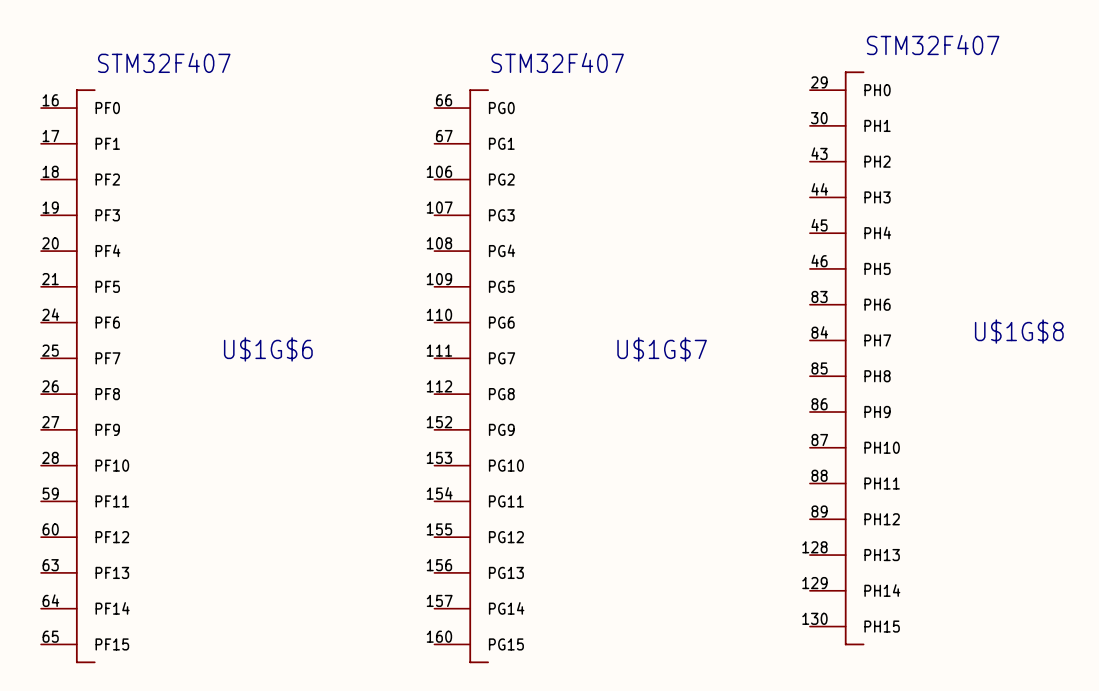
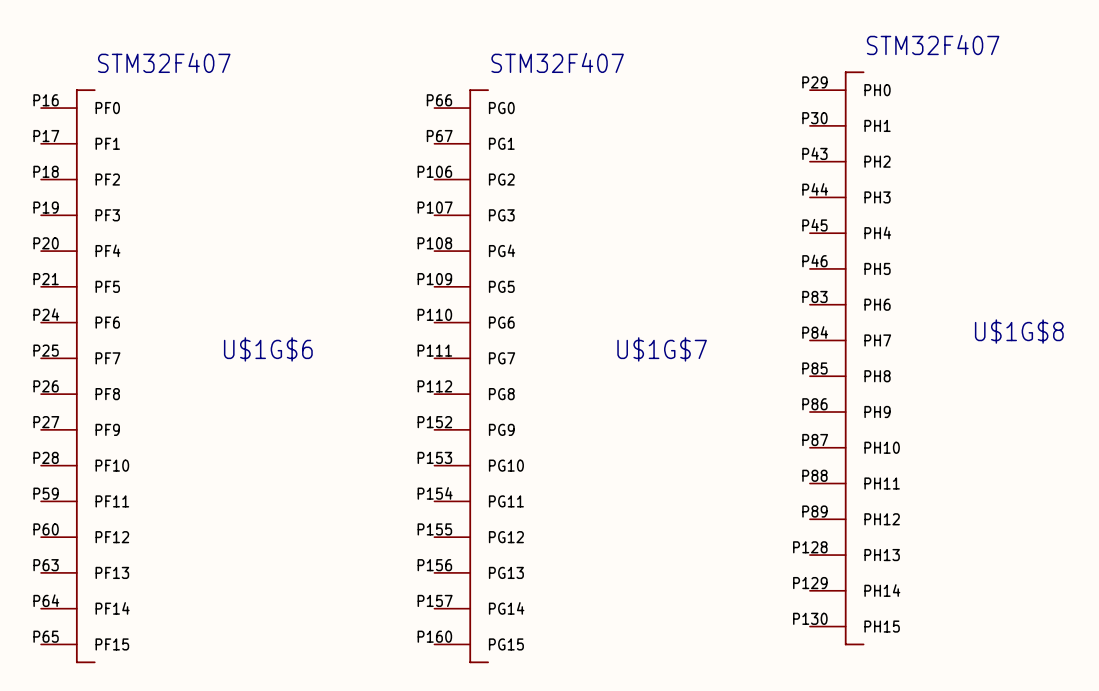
U$1G$8 symbol: [809, 71, 865, 646] -> [809, 71, 865, 646]
U$1G$6 symbol: [41, 89, 96, 664] -> [41, 89, 96, 664]
U$1G$7 symbol: [434, 89, 489, 664] -> [434, 89, 489, 664]

